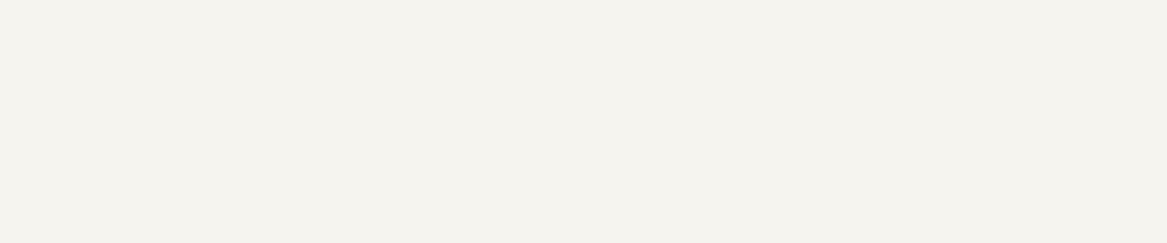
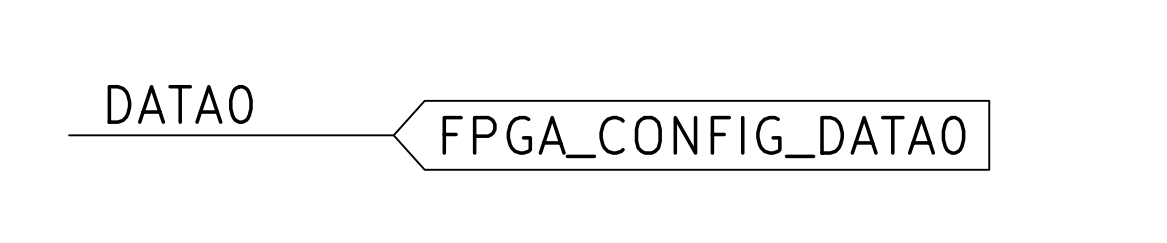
label: none -> DATA0 (180, 104)
wire: none -> (69, 135) (393, 135)
global label: none -> FPGA_CONFIG_DATA0 (703, 137)

